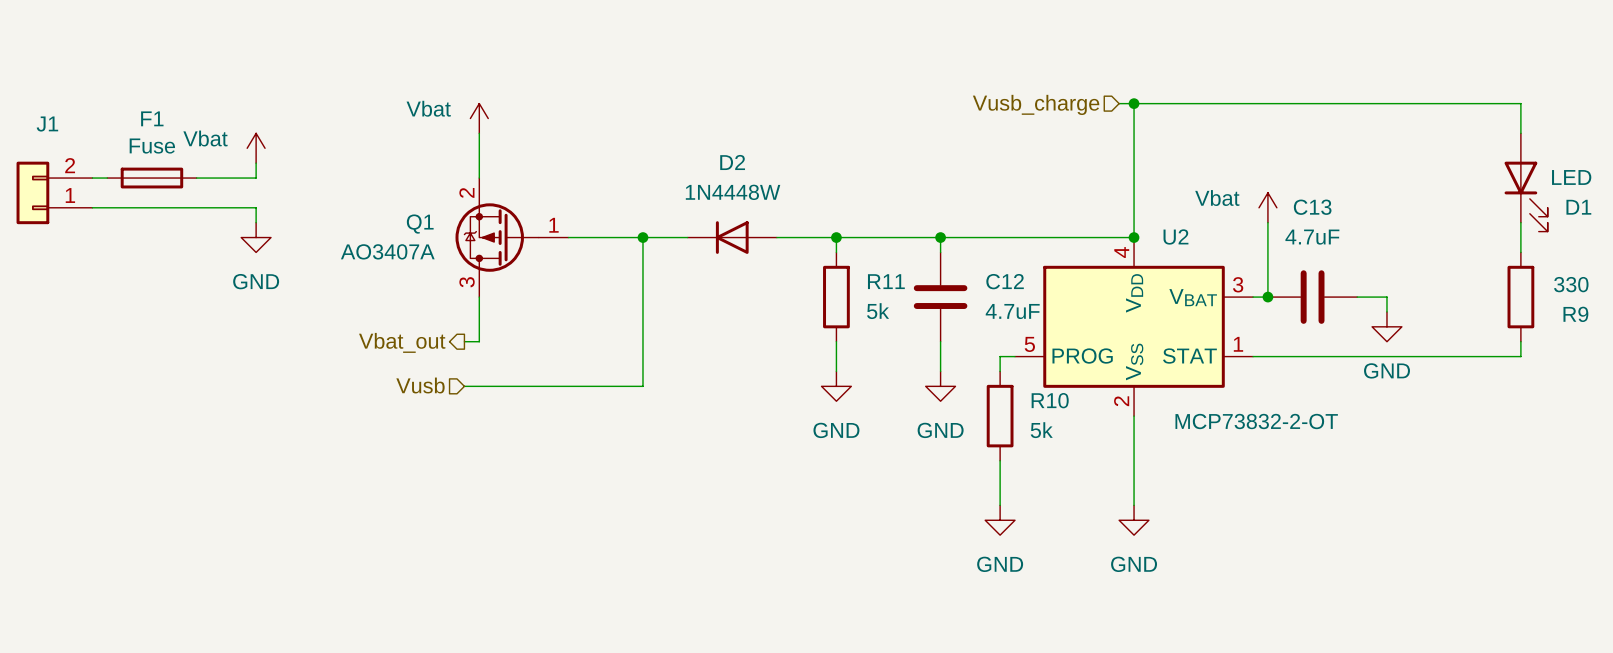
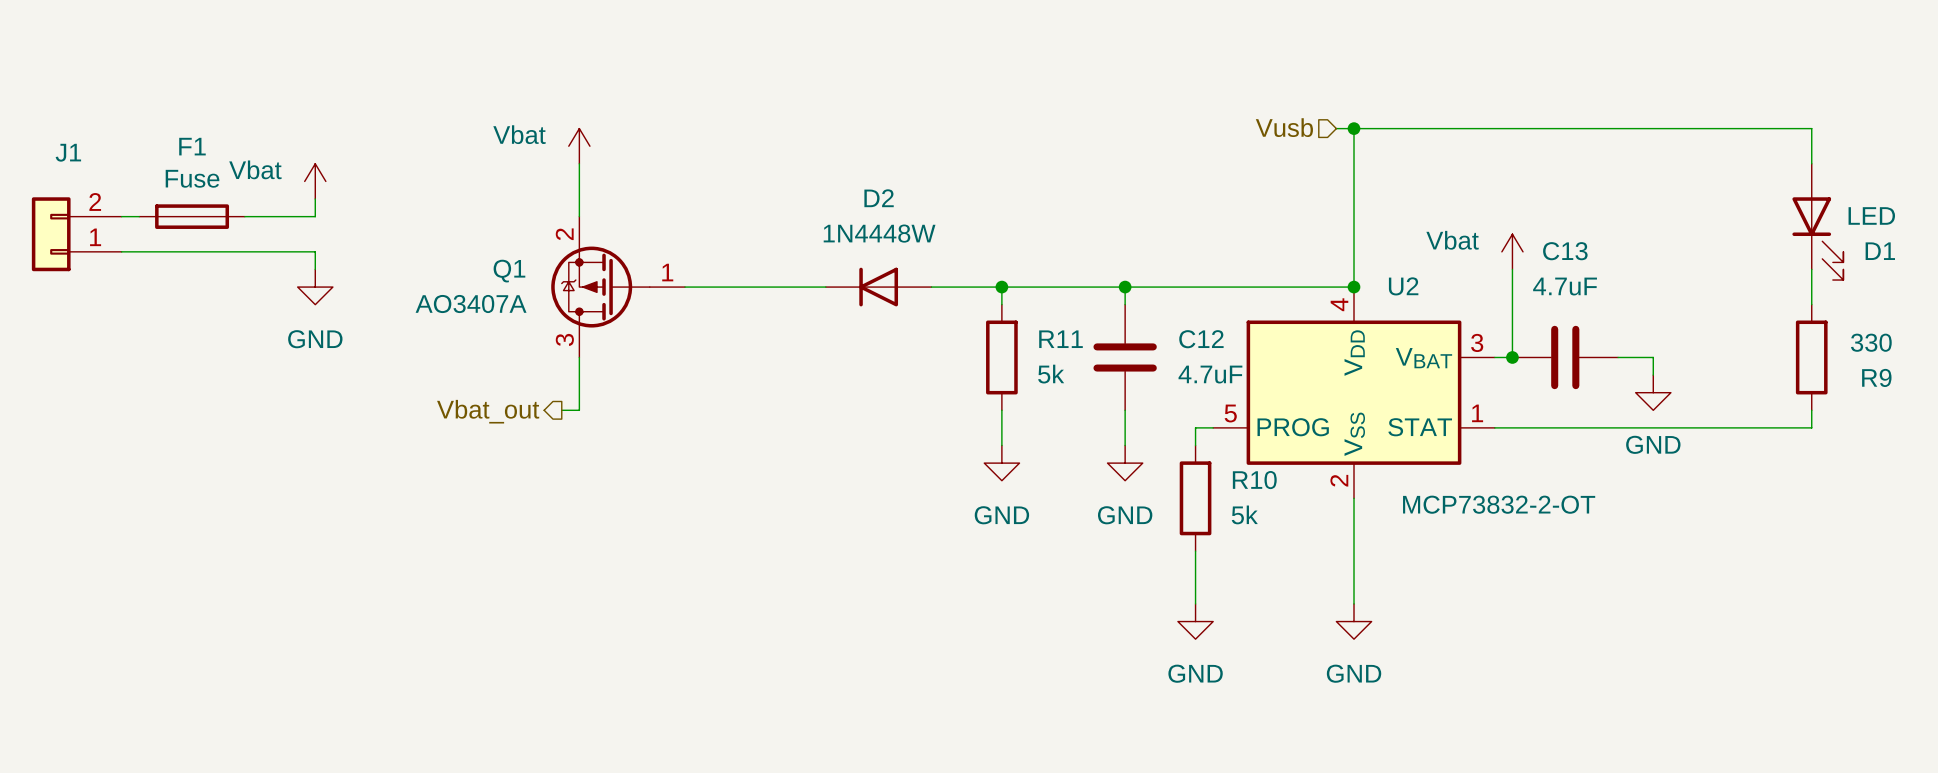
hierarchical label: Vusb_charge (1036, 104) -> Vusb (1284, 127)
wire: (642, 237) (642, 386) (464, 386) -> none
junction: (642, 237) -> none
hierarchical label: Vusb (420, 385) -> none

